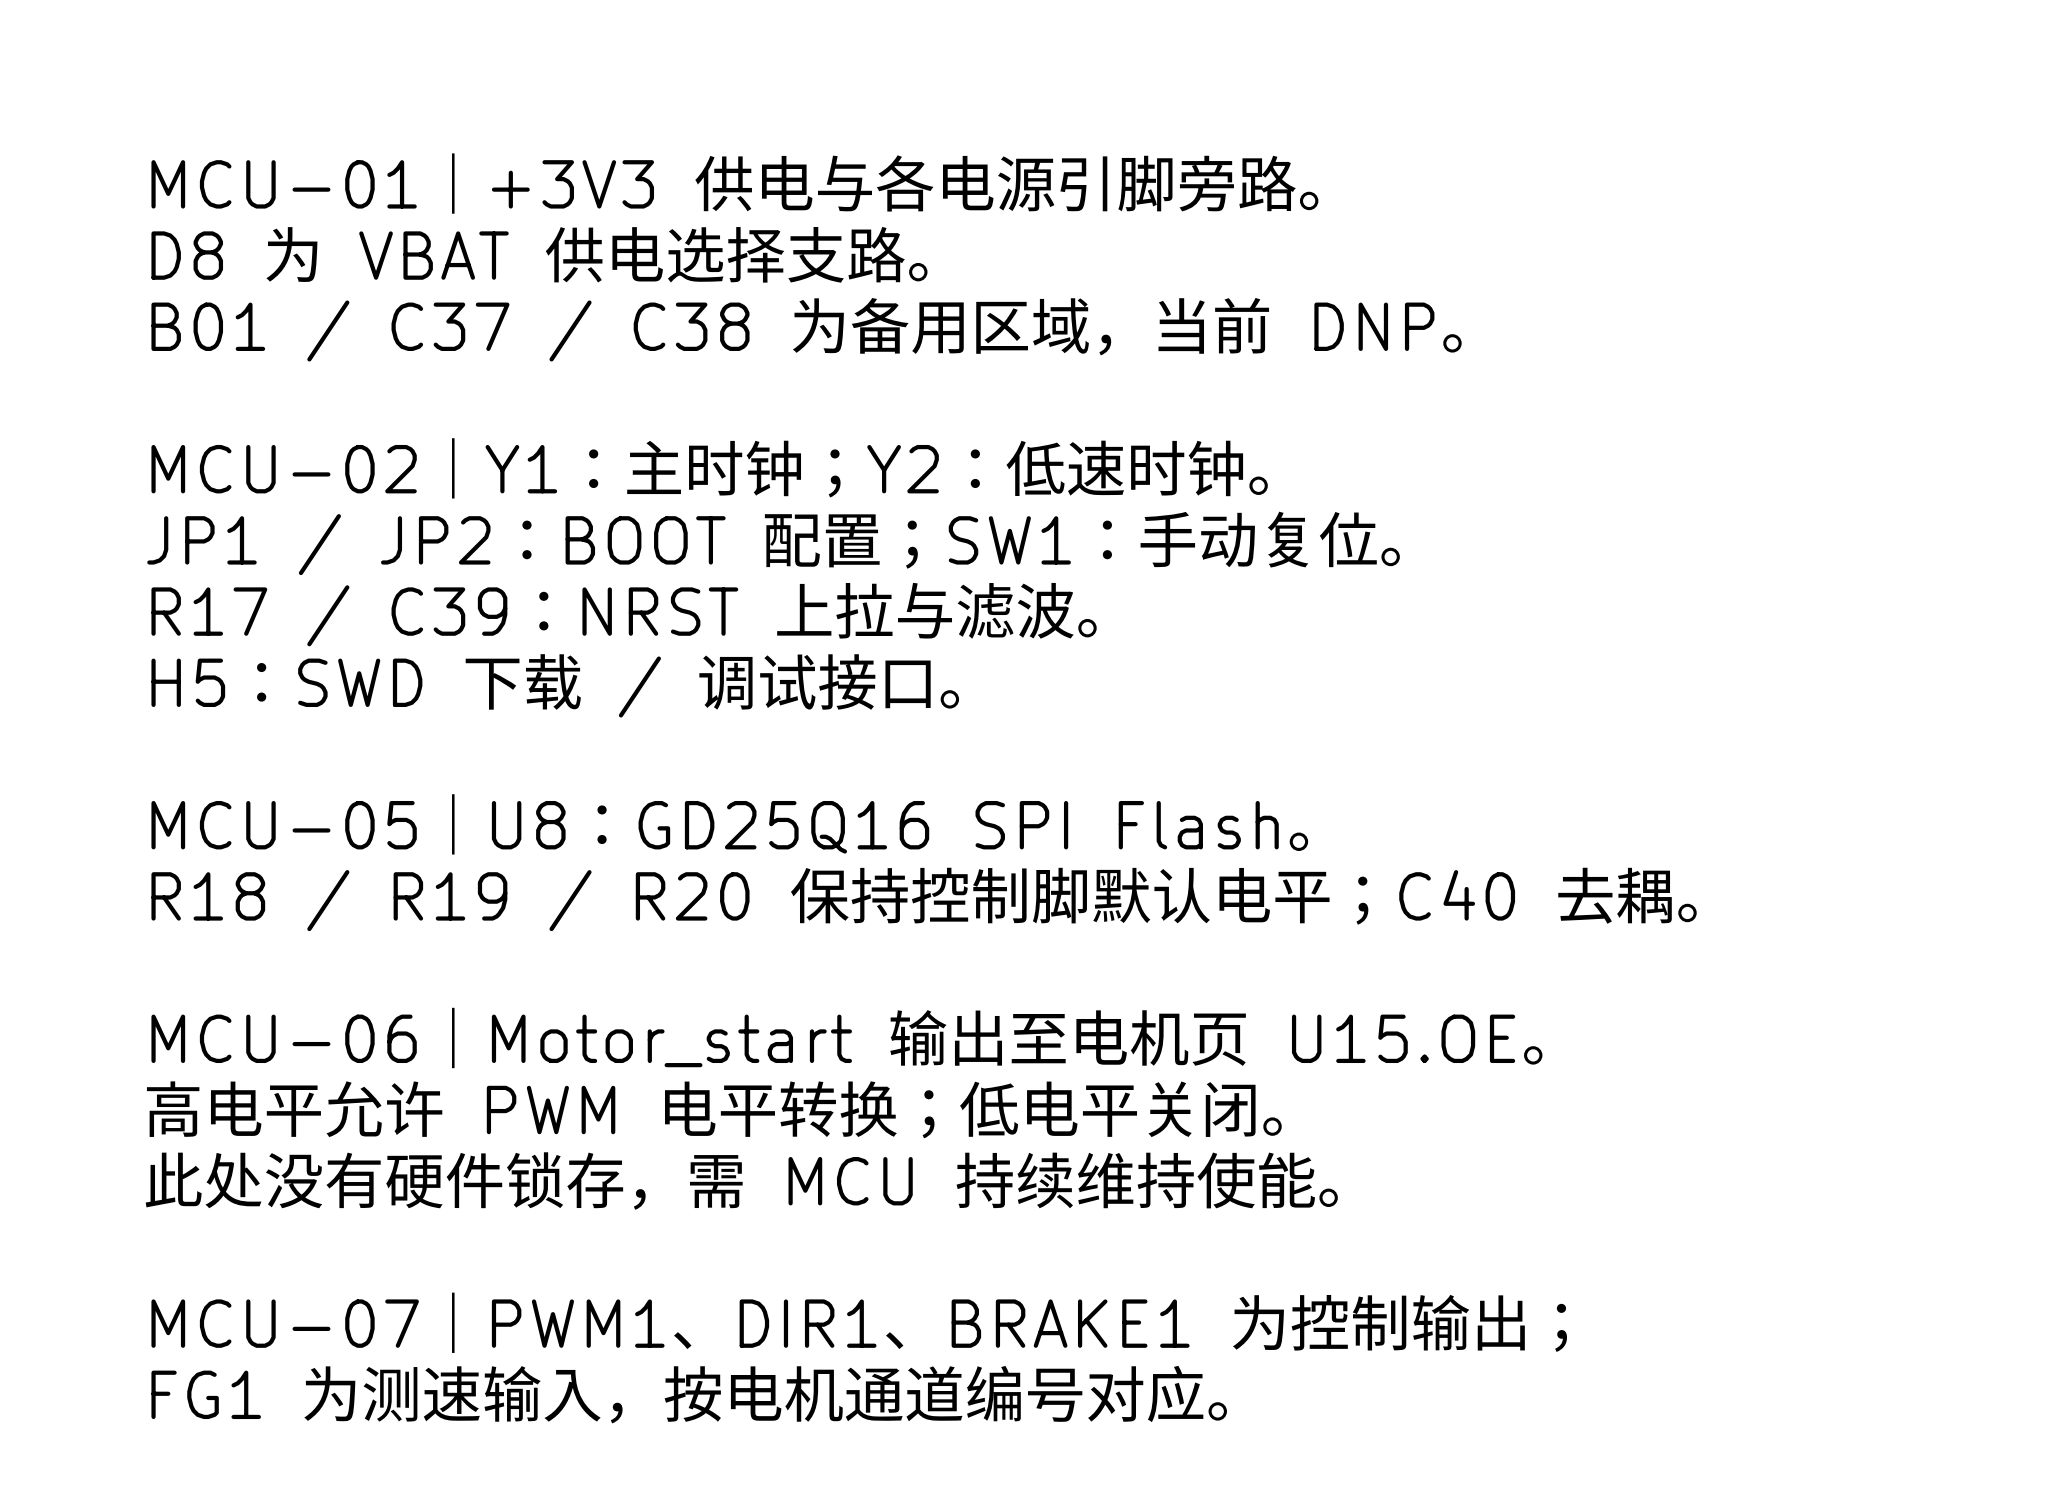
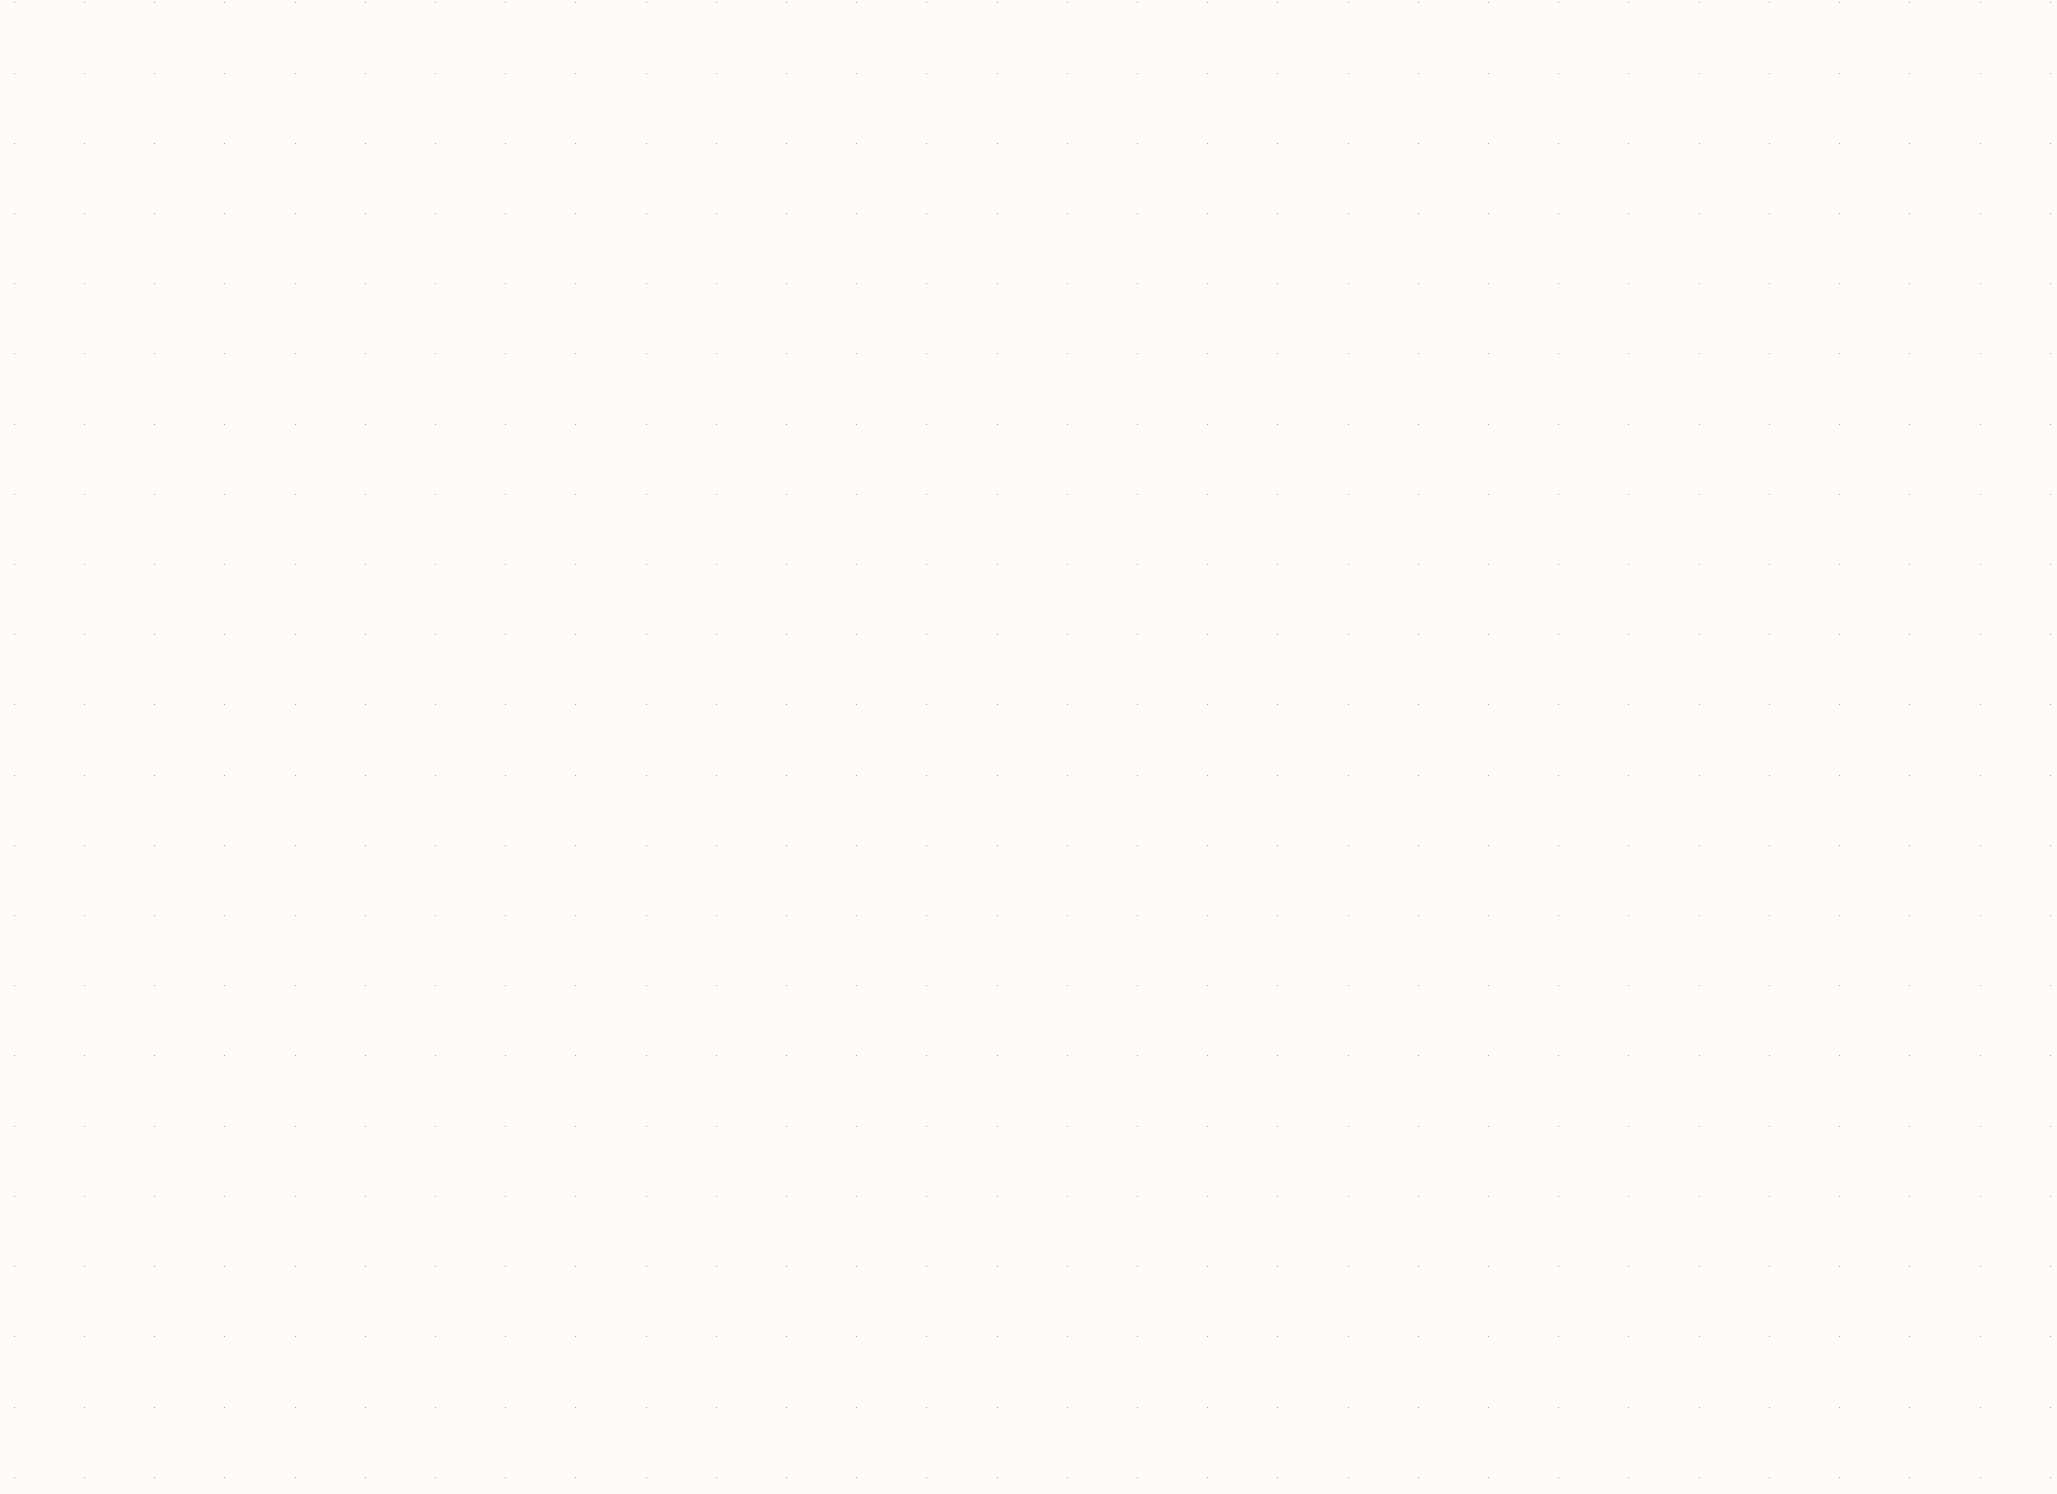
text: MCU-01｜+3V3 供电与各电源引脚旁路。 (735, 183) -> none
text: D8 为 VBAT 供电选择支路。 (540, 254) -> none
text: B01 / C37 / C38 为备用区域，当前 DNP。 (807, 328) -> none
text: MCU-02｜Y1：主时钟；Y2：低速时钟。 (710, 468) -> none
text: JP1 / JP2：BOOT 配置；SW1：手动复位。 (774, 542) -> none
text: R17 / C39：NRST 上拉与滤波。 (625, 613) -> none
text: H5：SWD 下载 / 调试接口。 (556, 684) -> none
text: MCU-05｜U8：GD25Q16 SPI Flash。 (730, 824) -> none
text: R18 / R19 / R20 保持控制脚默认电平；C40 去耦。 (925, 898) -> none
text: MCU-06｜Motor_start 输出至电机页 U15.OE。 (847, 1037) -> none
text: 高电平允许 PWM 电平转换；低电平关闭。 (714, 1109) -> none
text: 此处没有硬件锁存，需 MCU 持续维持使能。 (741, 1181) -> none
text: MCU-07｜PWM1、DIR1、BRAKE1 为控制输出； (860, 1322) -> none
text: FG1 为测速输入，按电机通道编号对应。 (690, 1394) -> none

